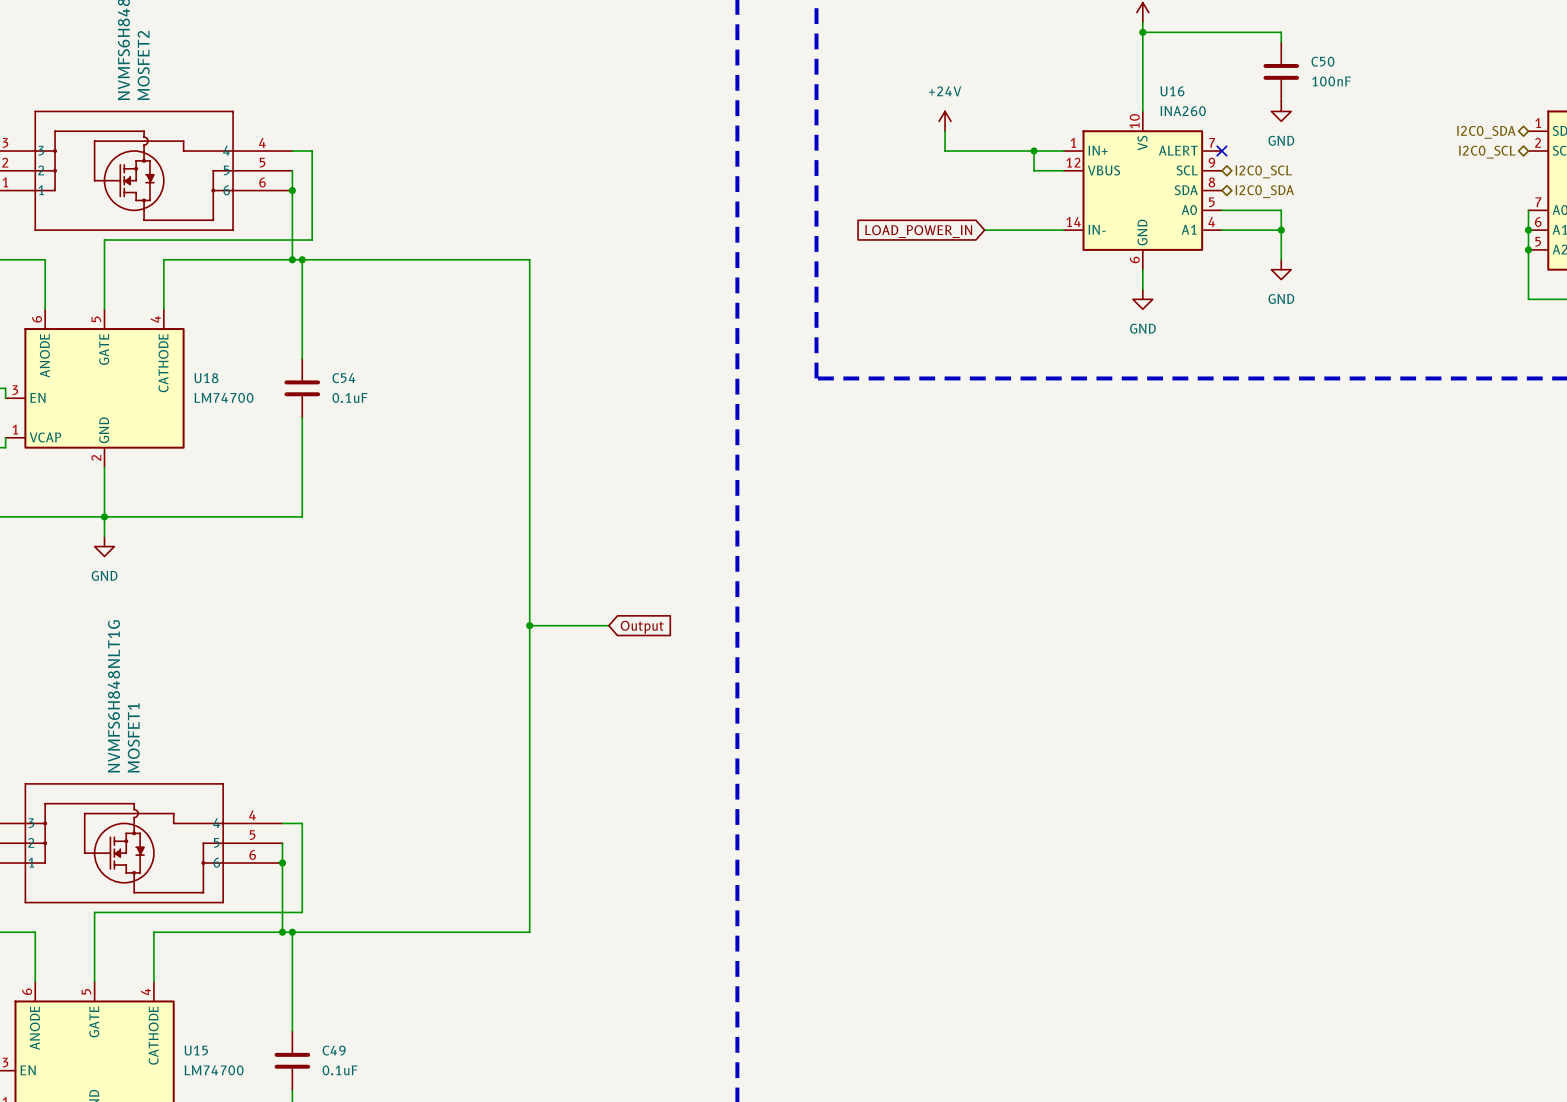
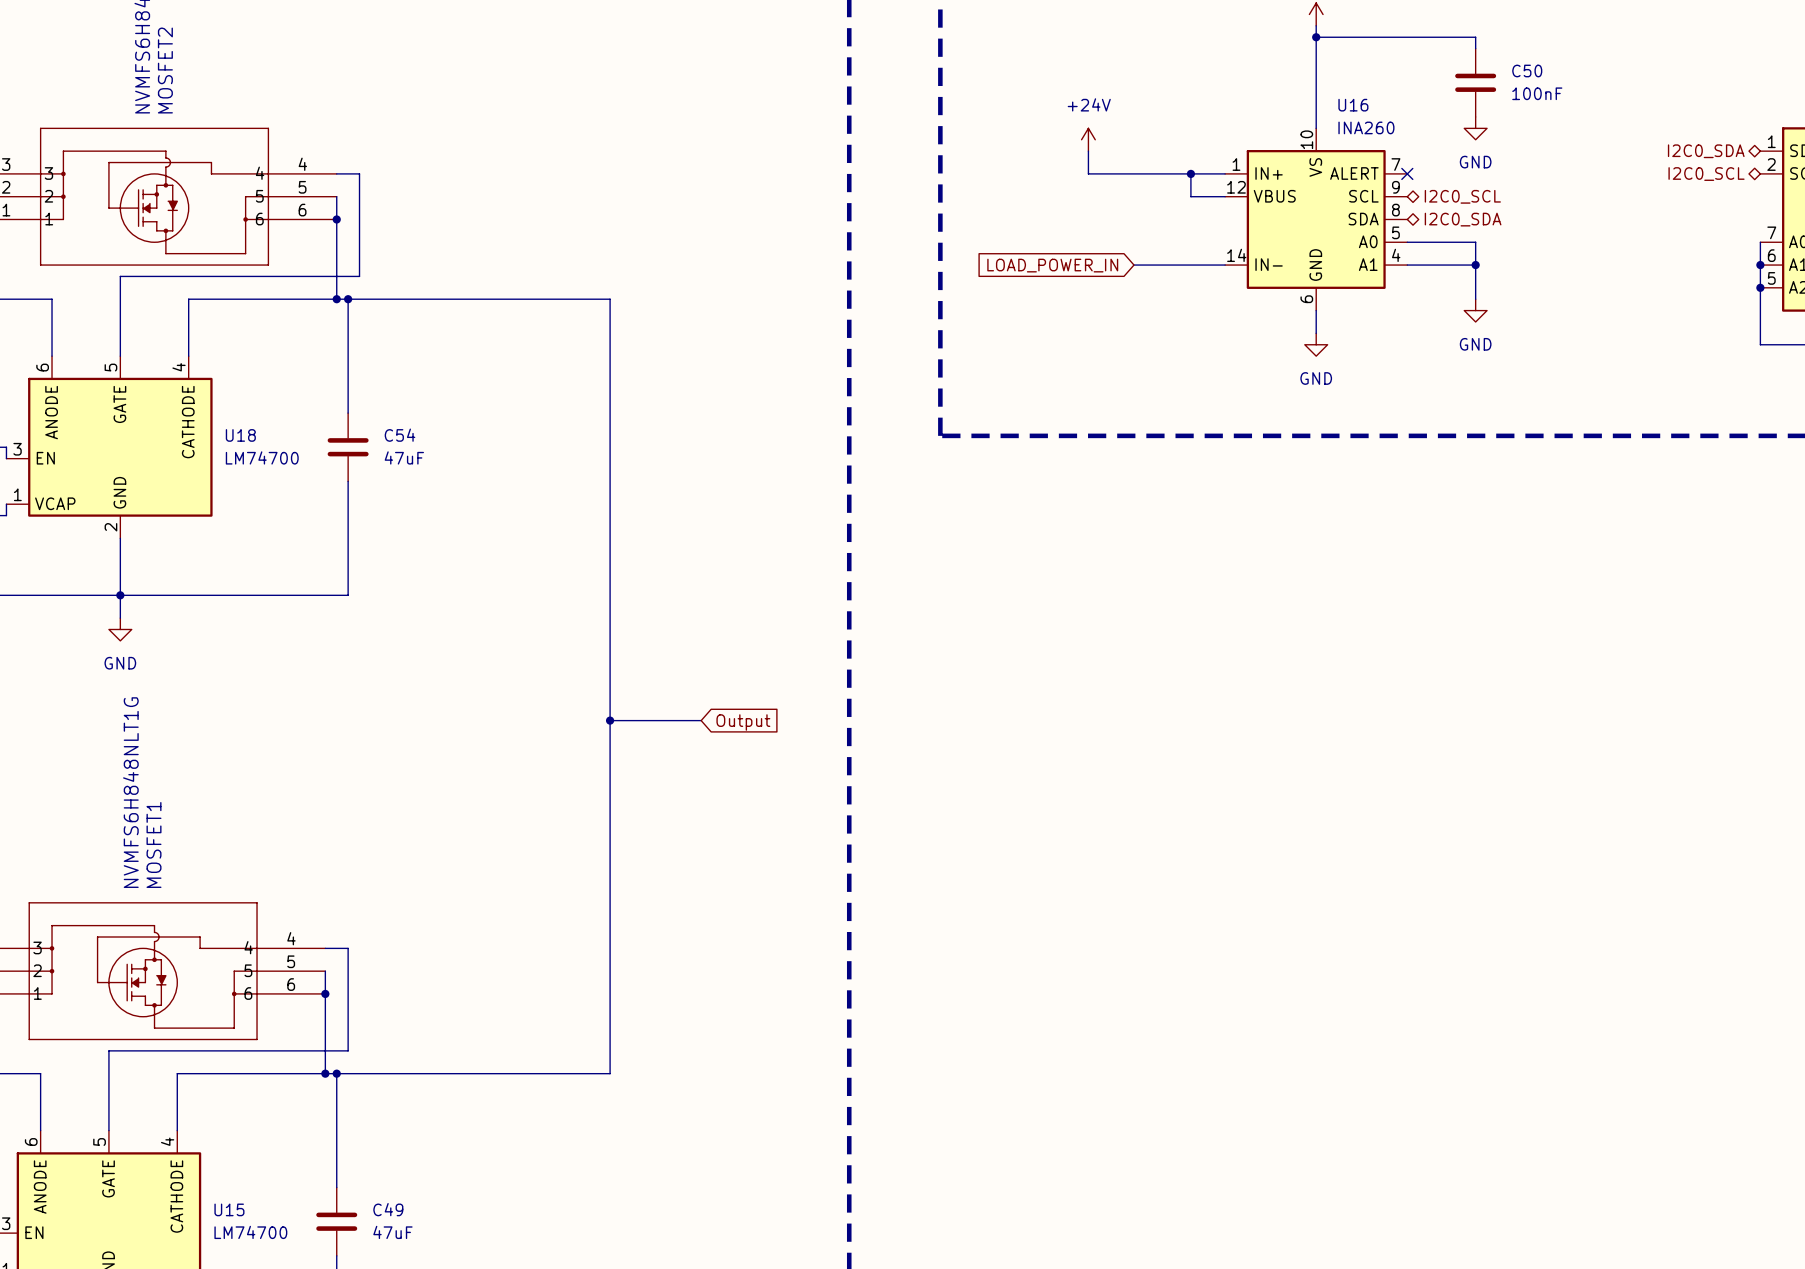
C54 value: 0.1uF (349, 397) -> 47uF (404, 457)
C49 value: 0.1uF (340, 1070) -> 47uF (392, 1232)

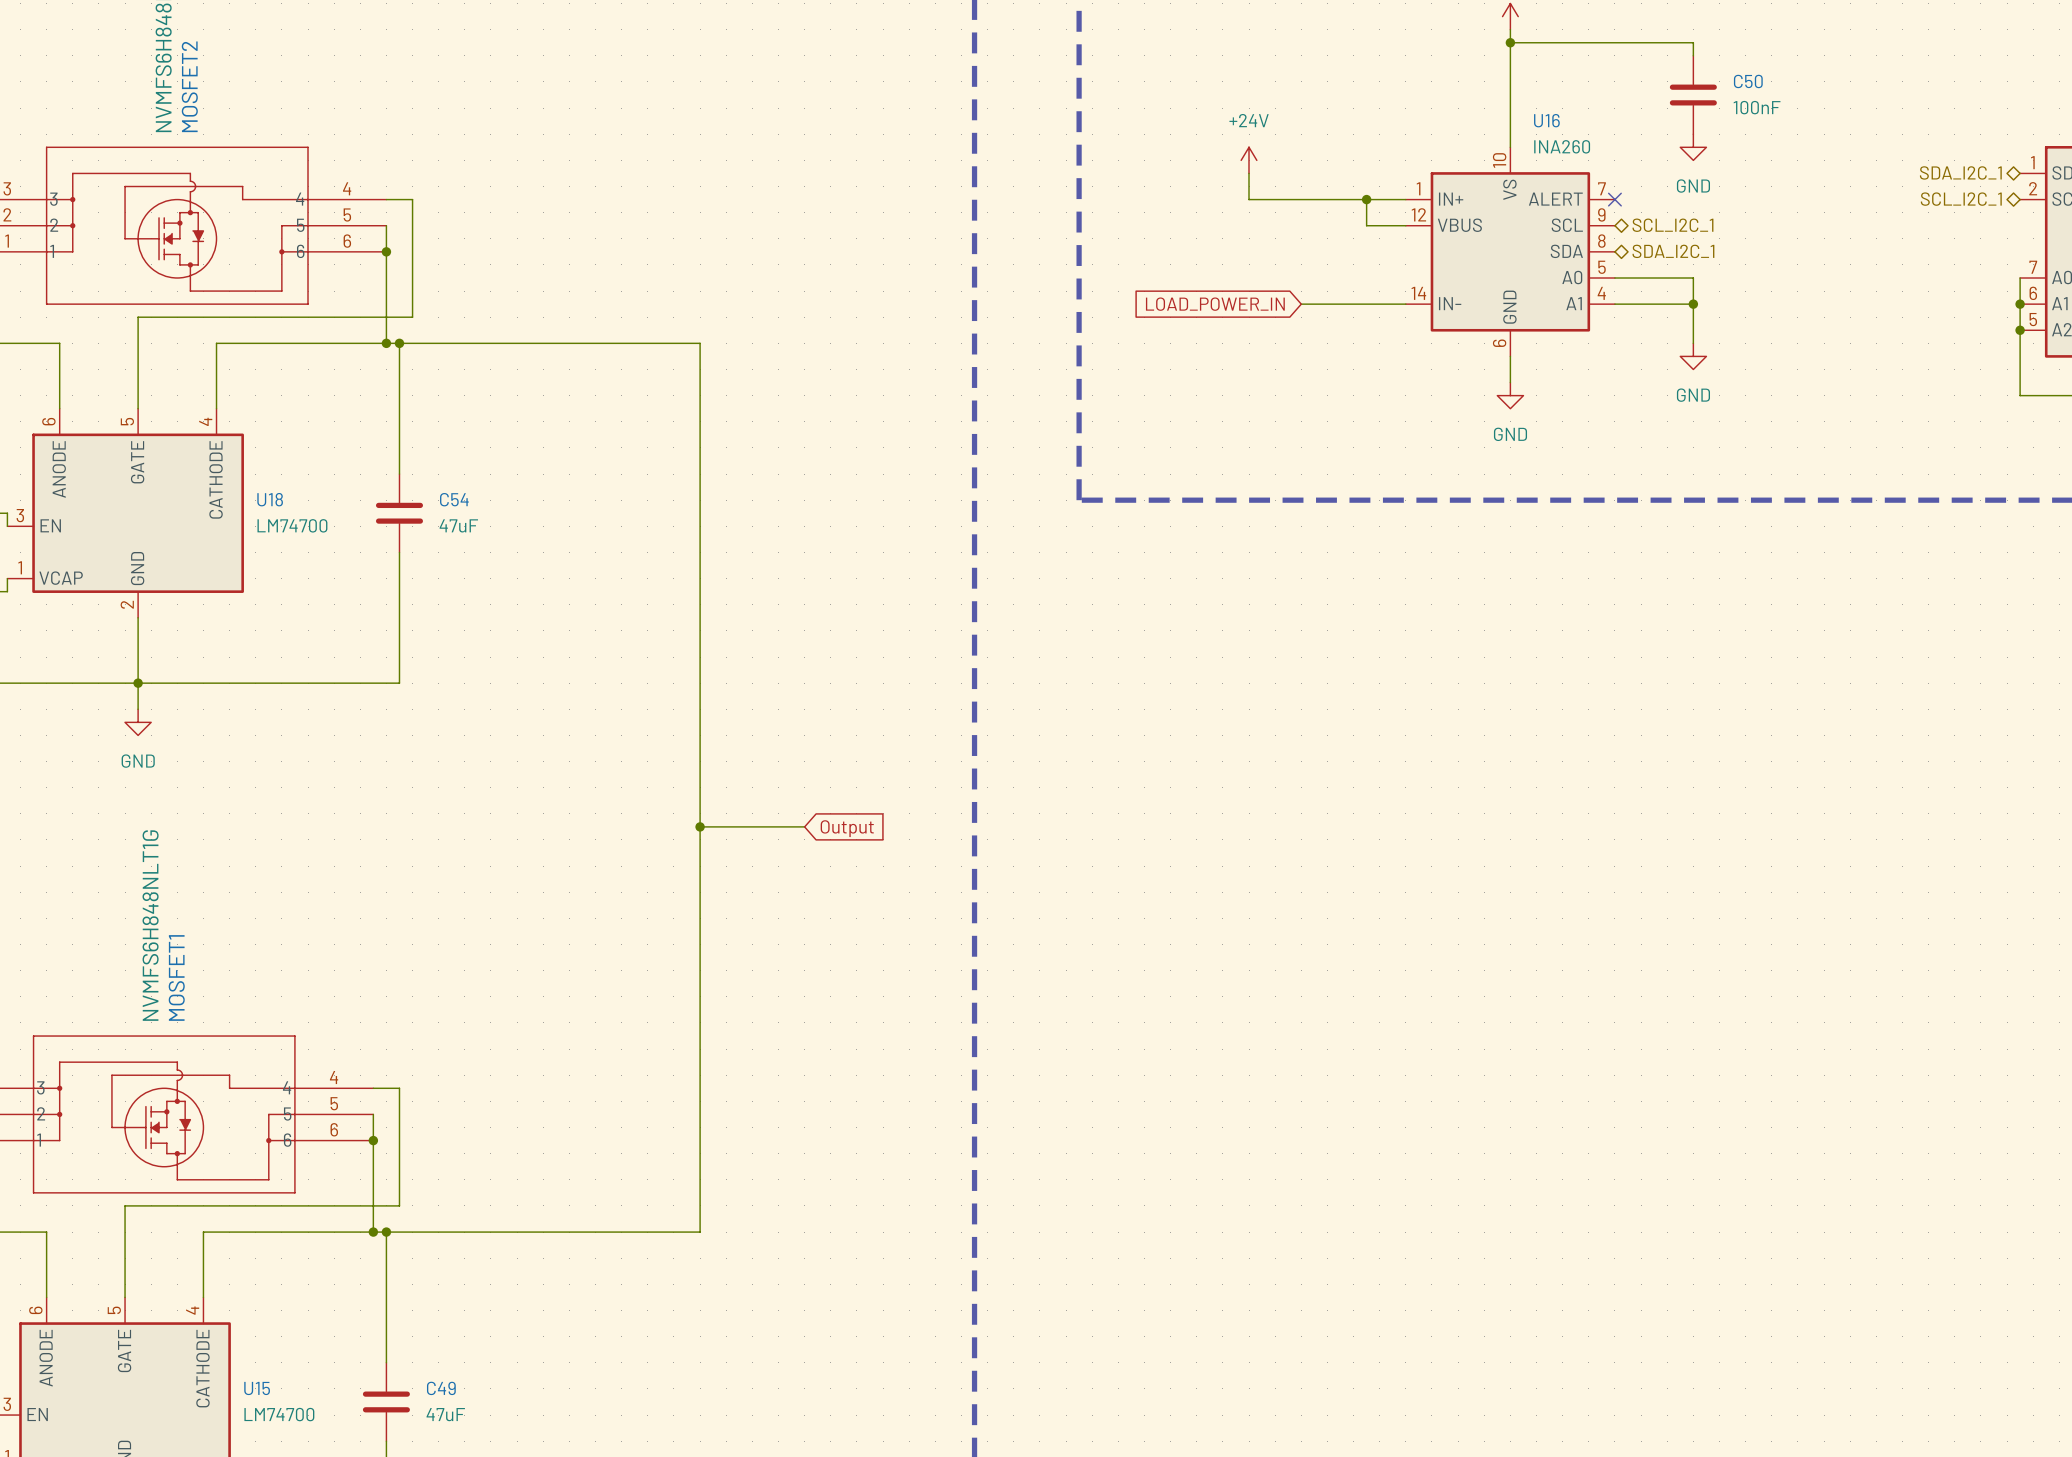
hierarchical label: I2C0_SDA (1706, 151) -> SDA_I2C_1 (1960, 172)
hierarchical label: I2C0_SCL (1706, 174) -> SCL_I2C_1 (1961, 199)
hierarchical label: I2C0_SCL (1462, 196) -> SCL_I2C_1 (1672, 225)
hierarchical label: I2C0_SDA (1463, 219) -> SDA_I2C_1 (1673, 251)

